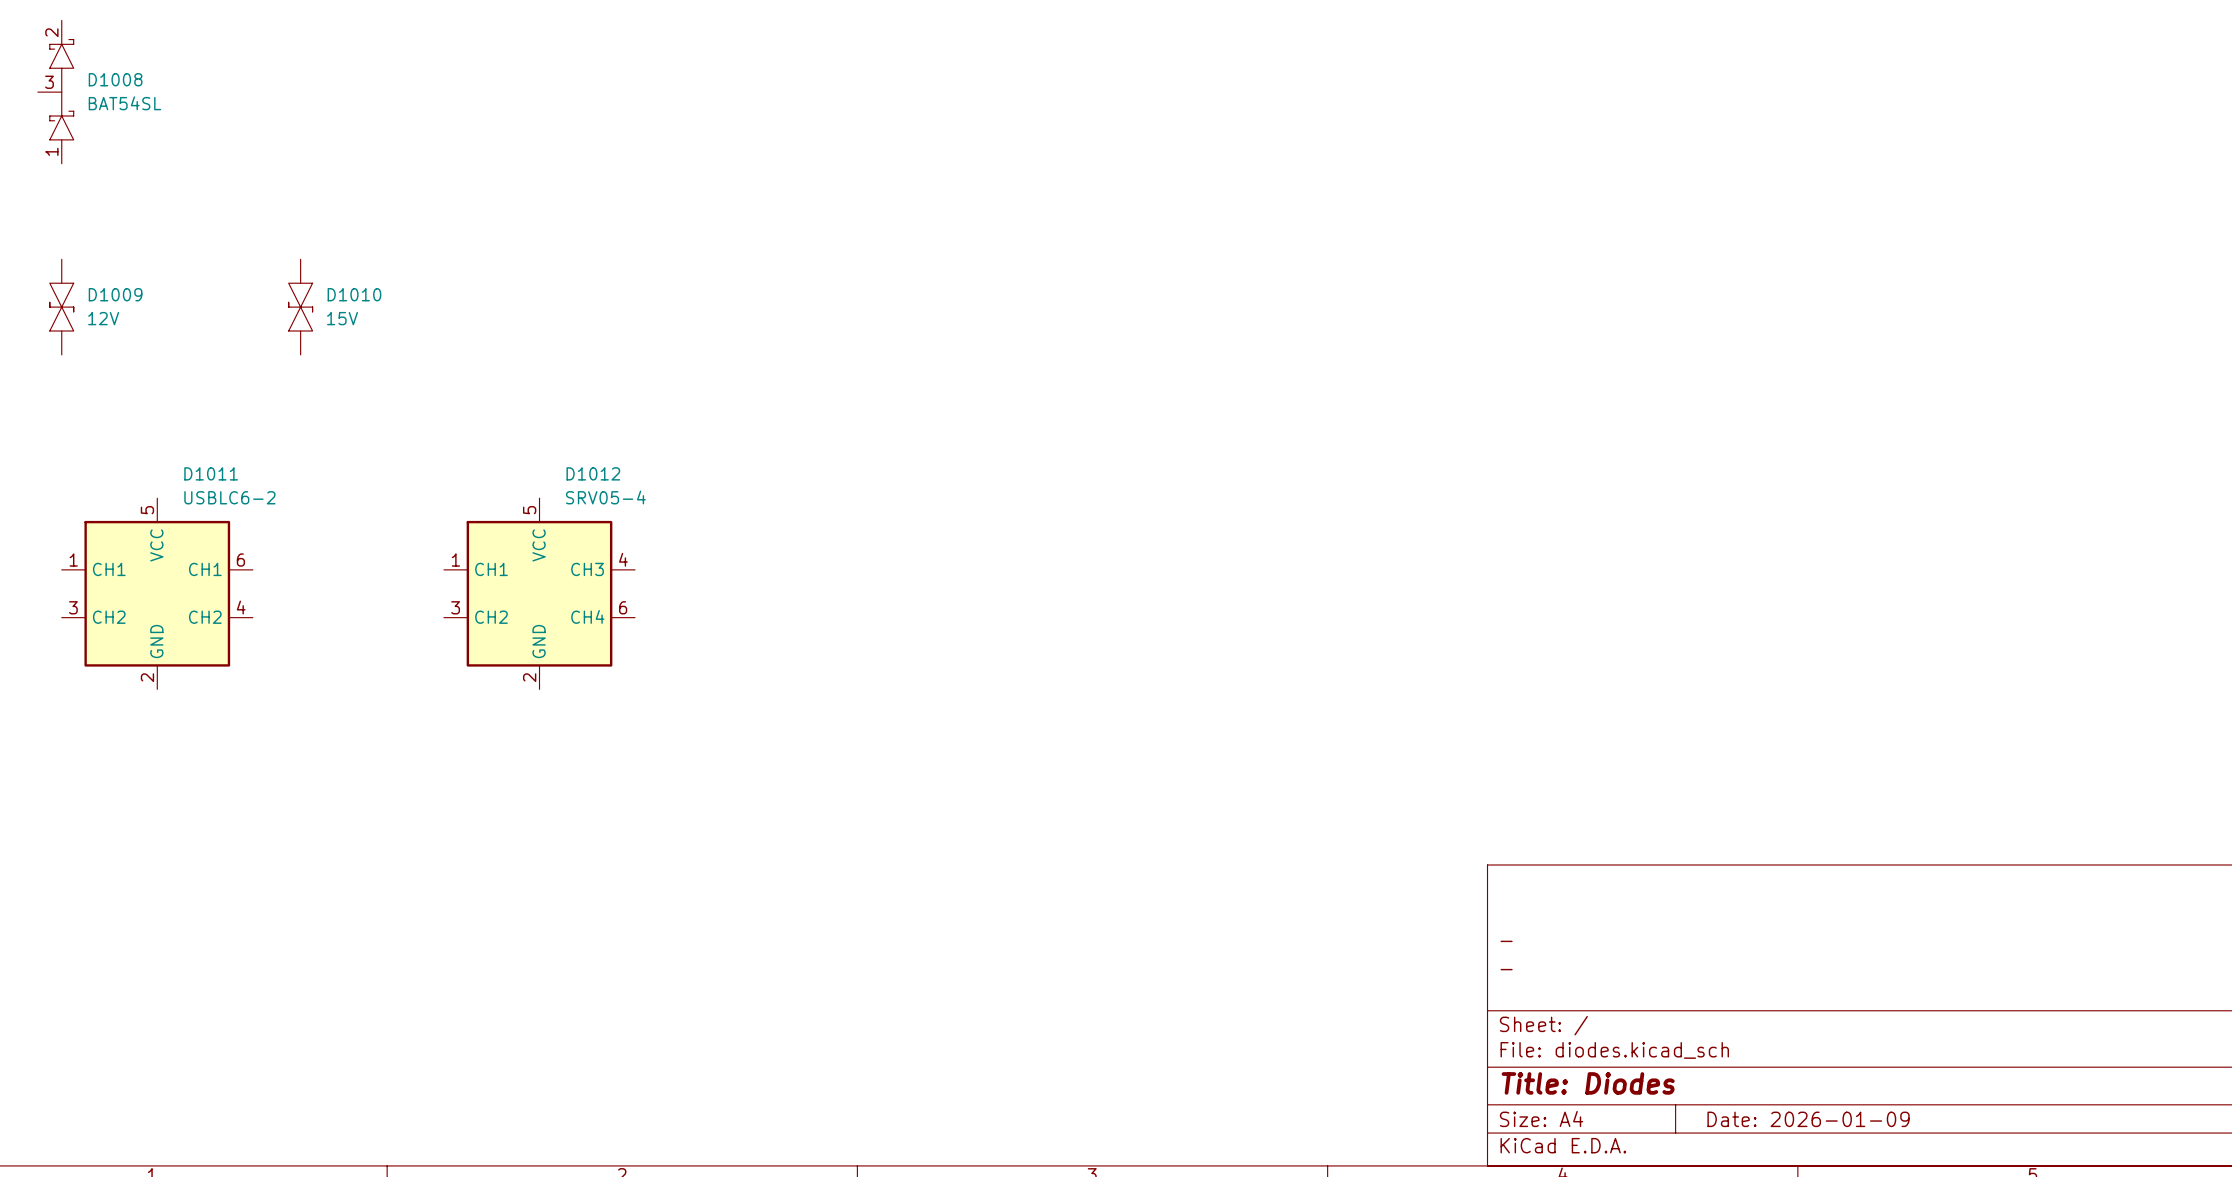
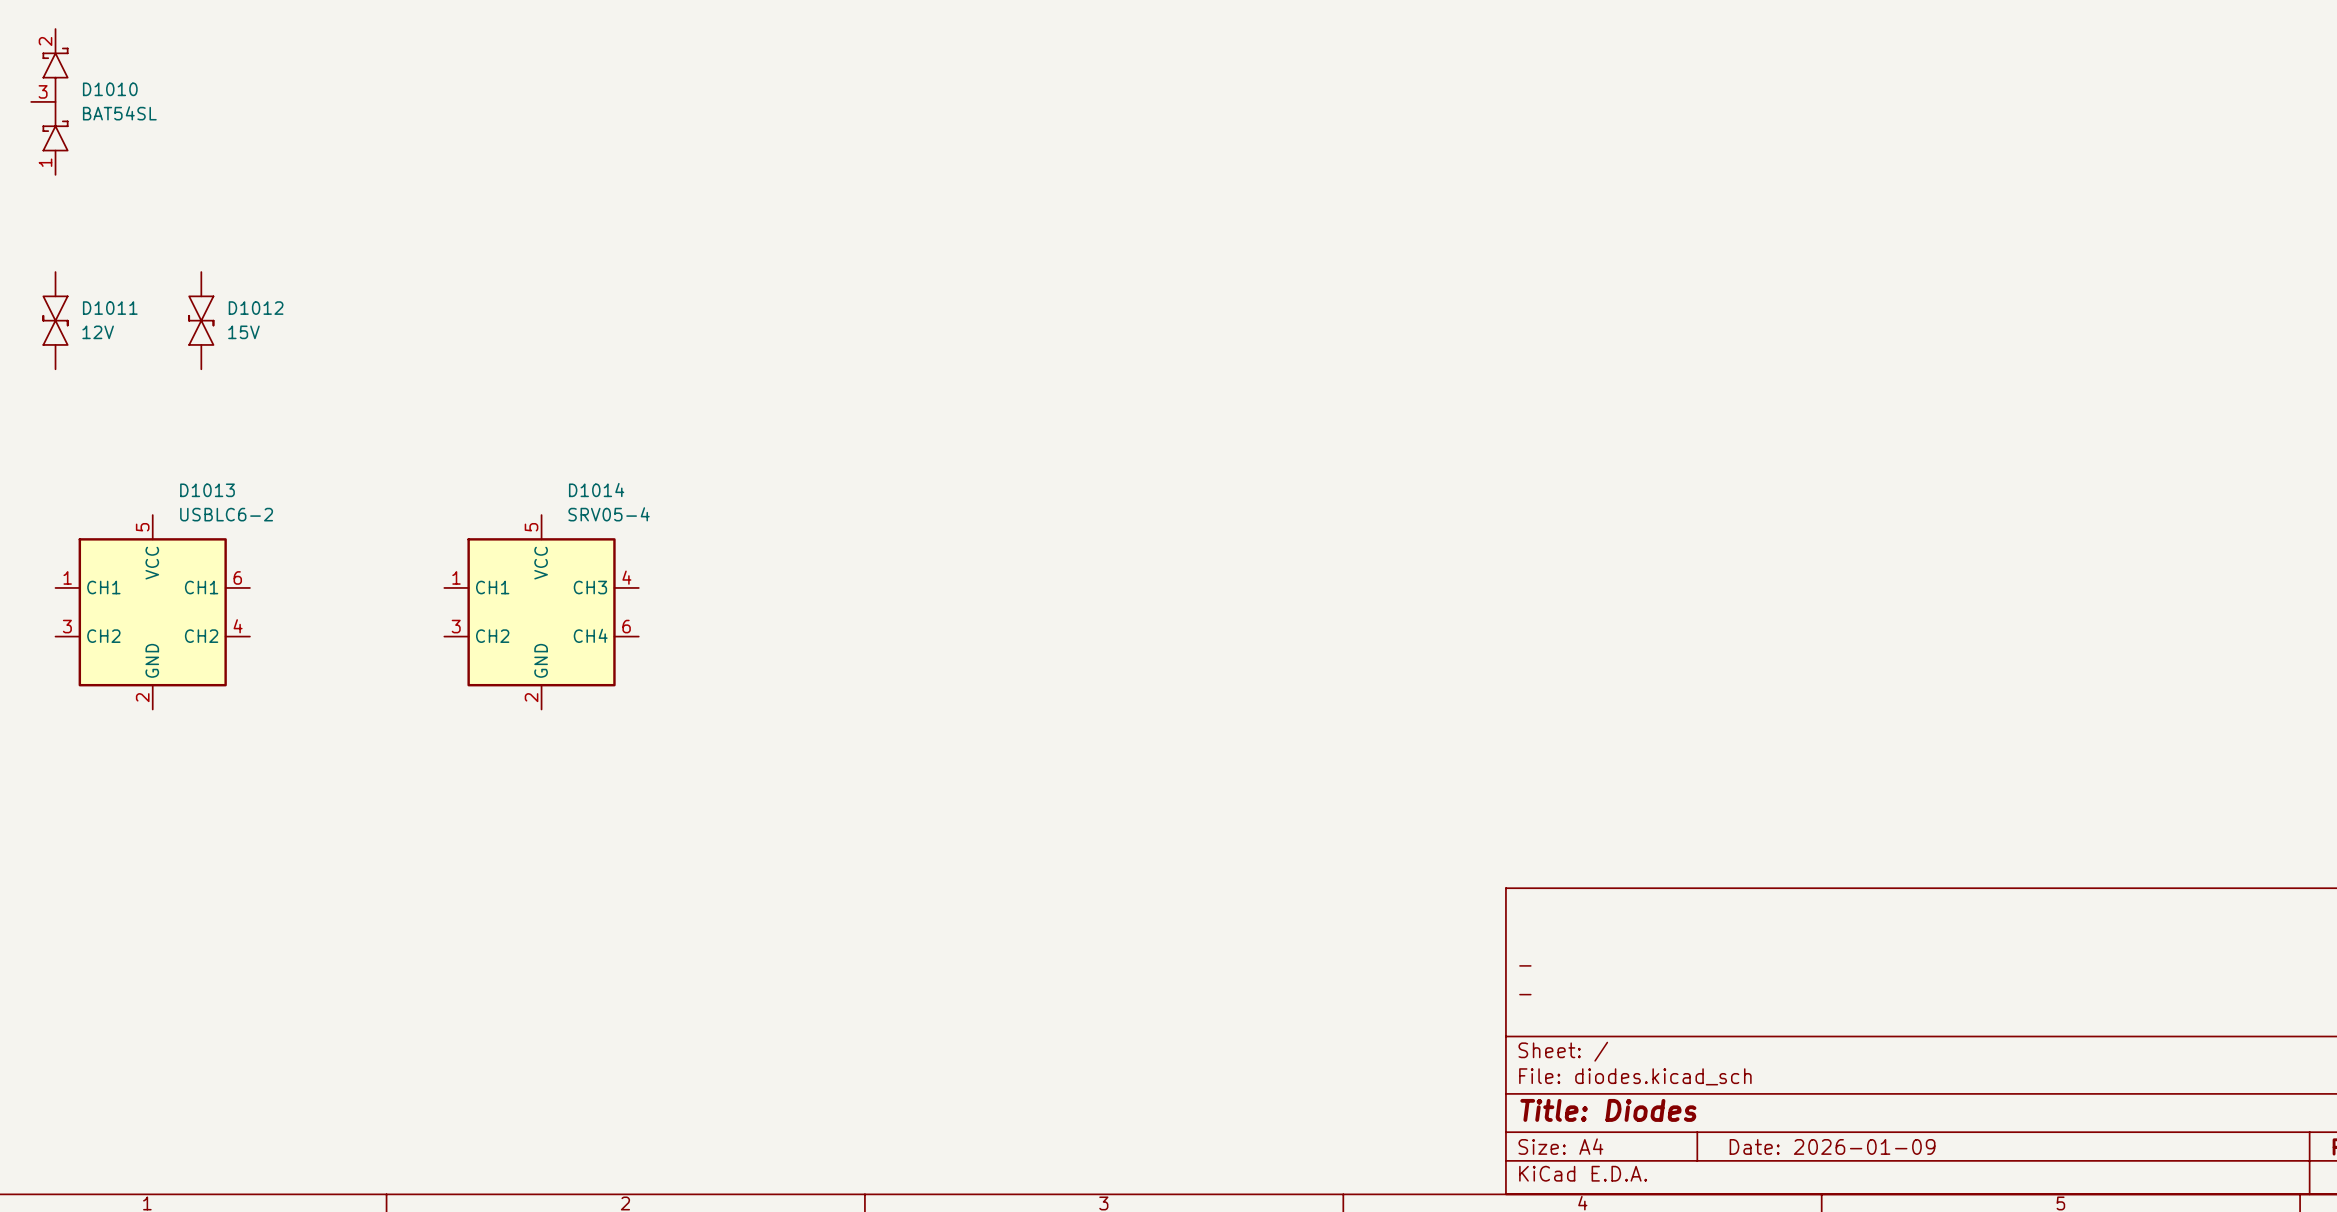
D1008 name: D1008 (115, 79) -> D1010 (110, 89)
D1009 name: D1009 (115, 294) -> D1011 (110, 308)
D1012: none -> 15V (201, 320)
D1010: 15V (300, 307) -> none
D1011 name: D1011 (211, 473) -> D1013 (207, 490)
D1012 name: D1012 (593, 473) -> D1014 (596, 490)

